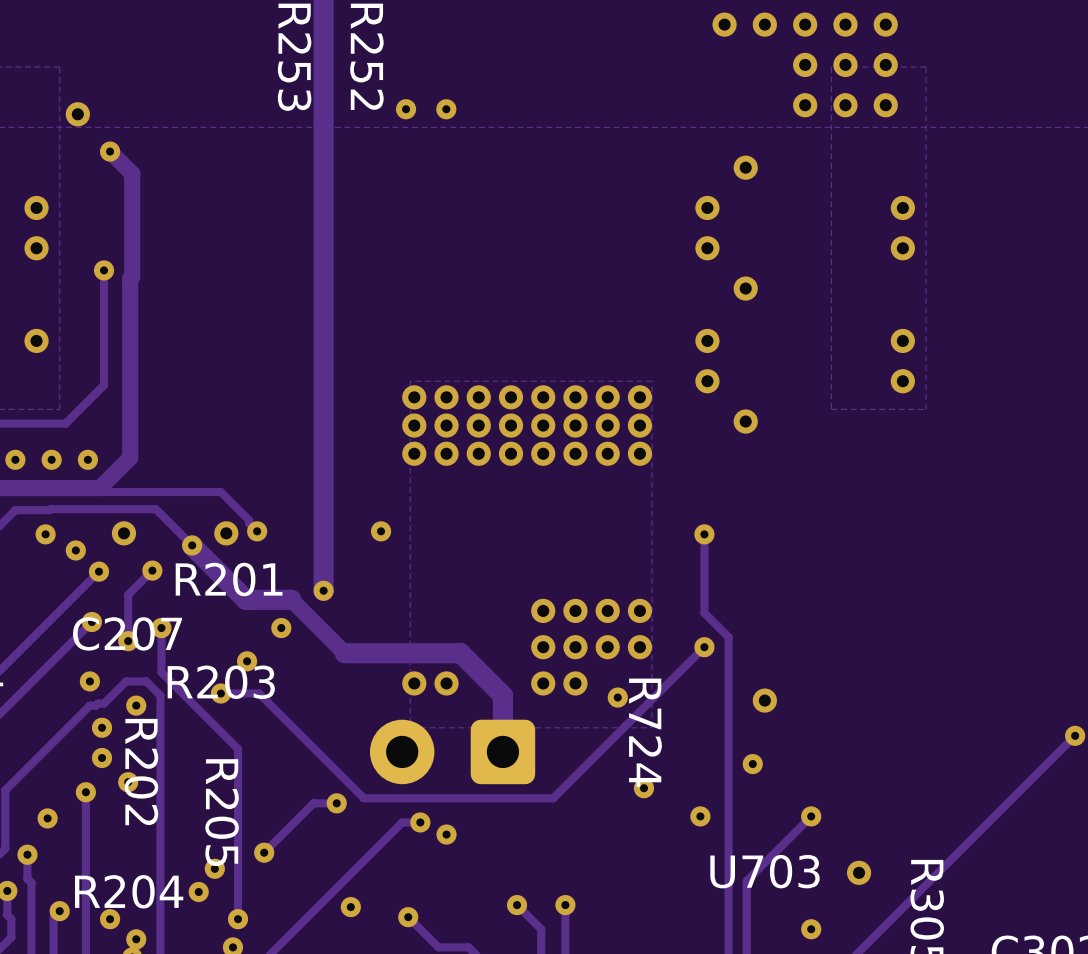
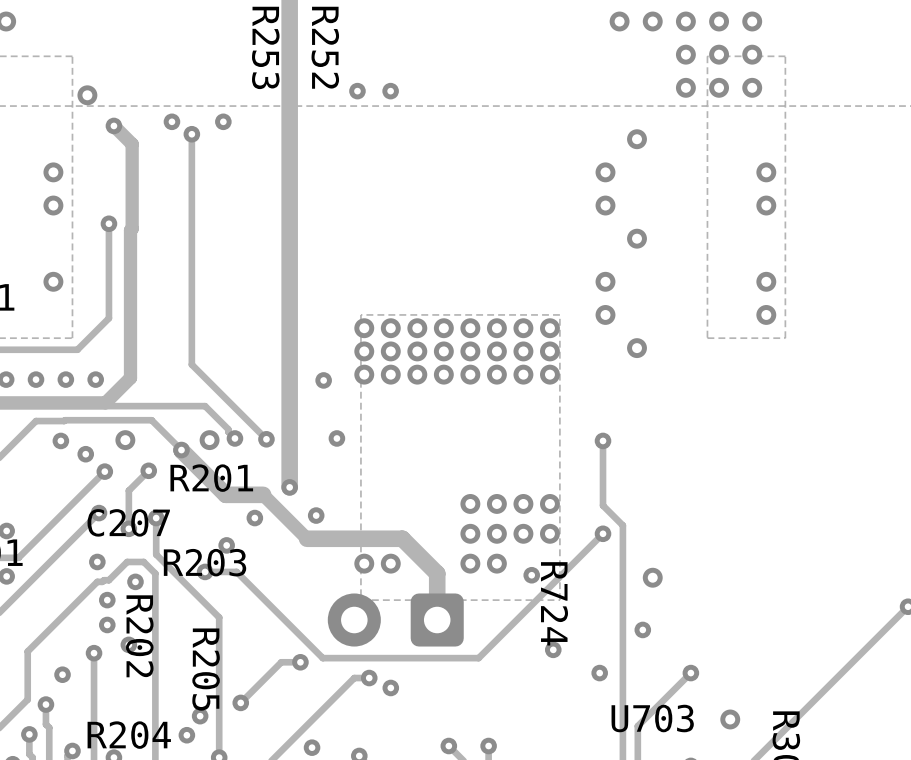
via: none -> (171, 121)
via: none -> (223, 121)
track: none -> (191, 134) (191, 364) (266, 439)
via: none -> (191, 134)
via: none -> (323, 380)
via: none -> (266, 439)
via: none -> (316, 515)

